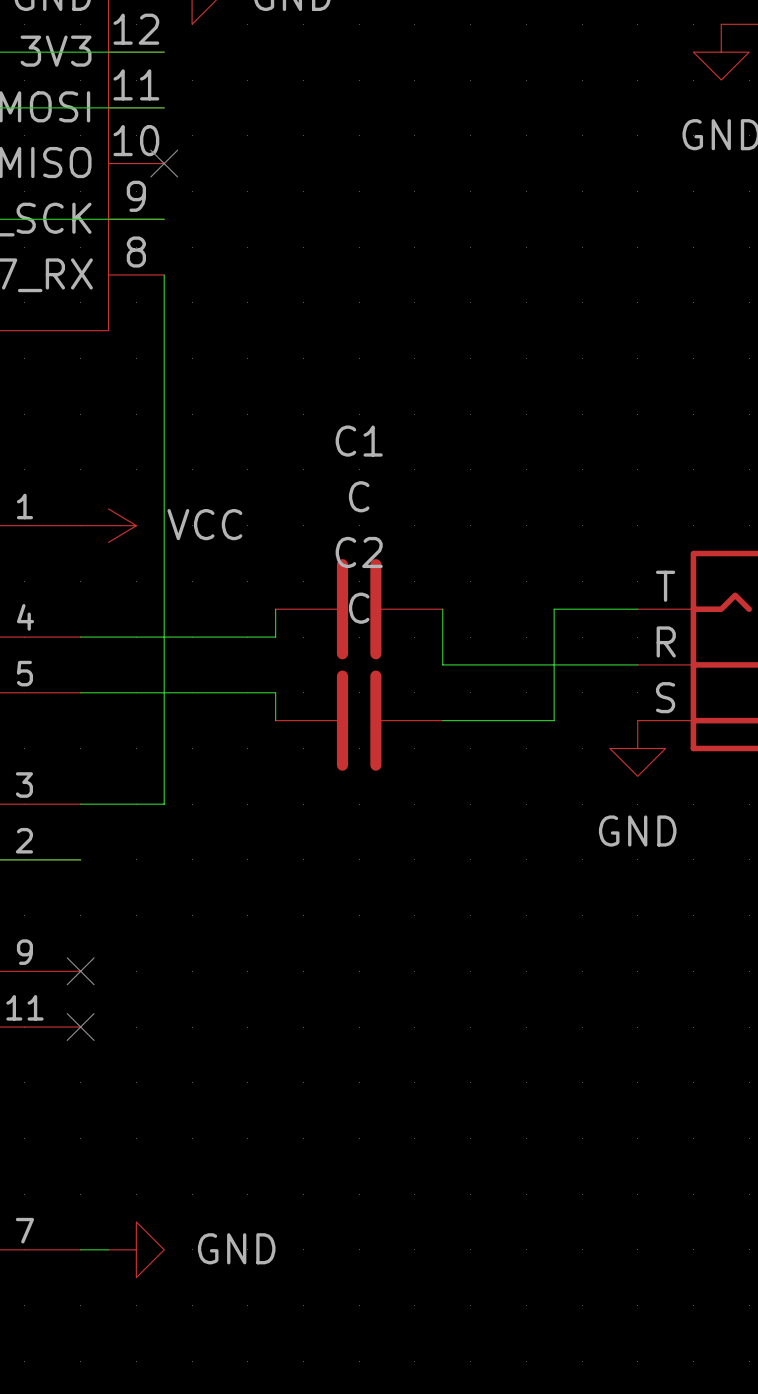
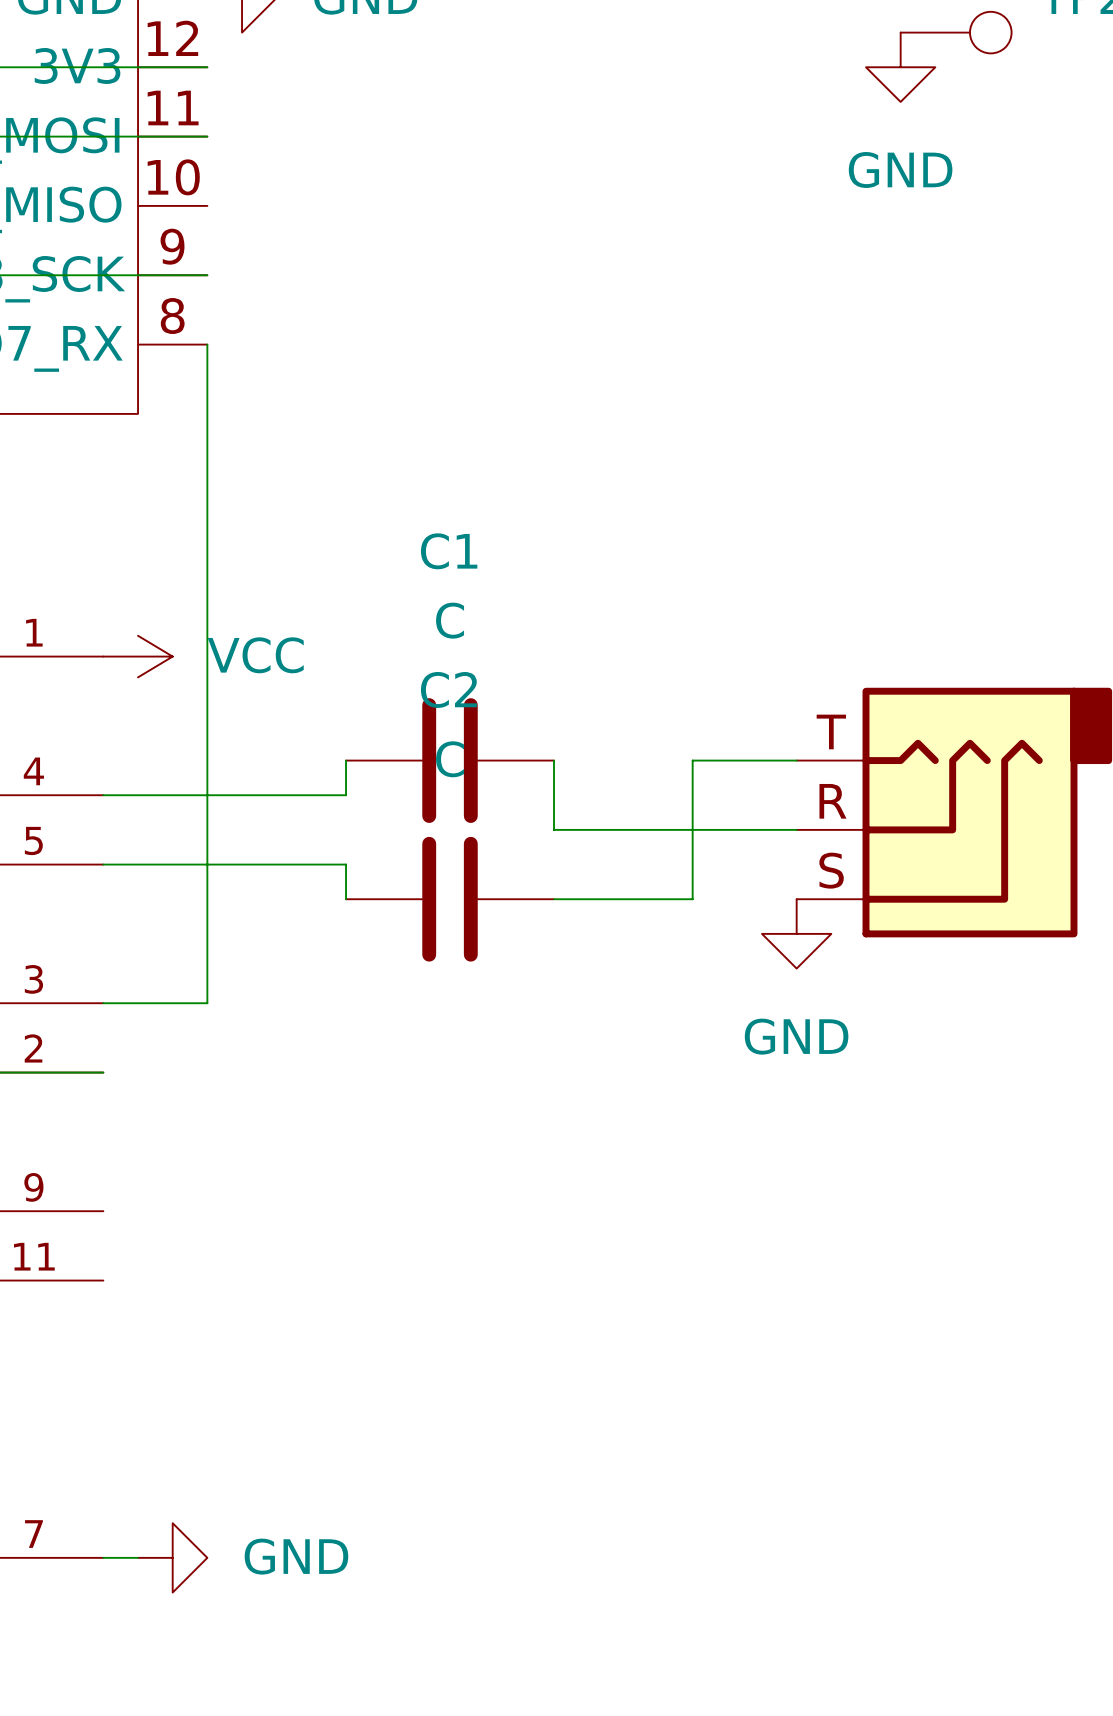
no-connect mark: (164, 163) -> none
no-connect mark: (80, 971) -> none
no-connect mark: (80, 1027) -> none

